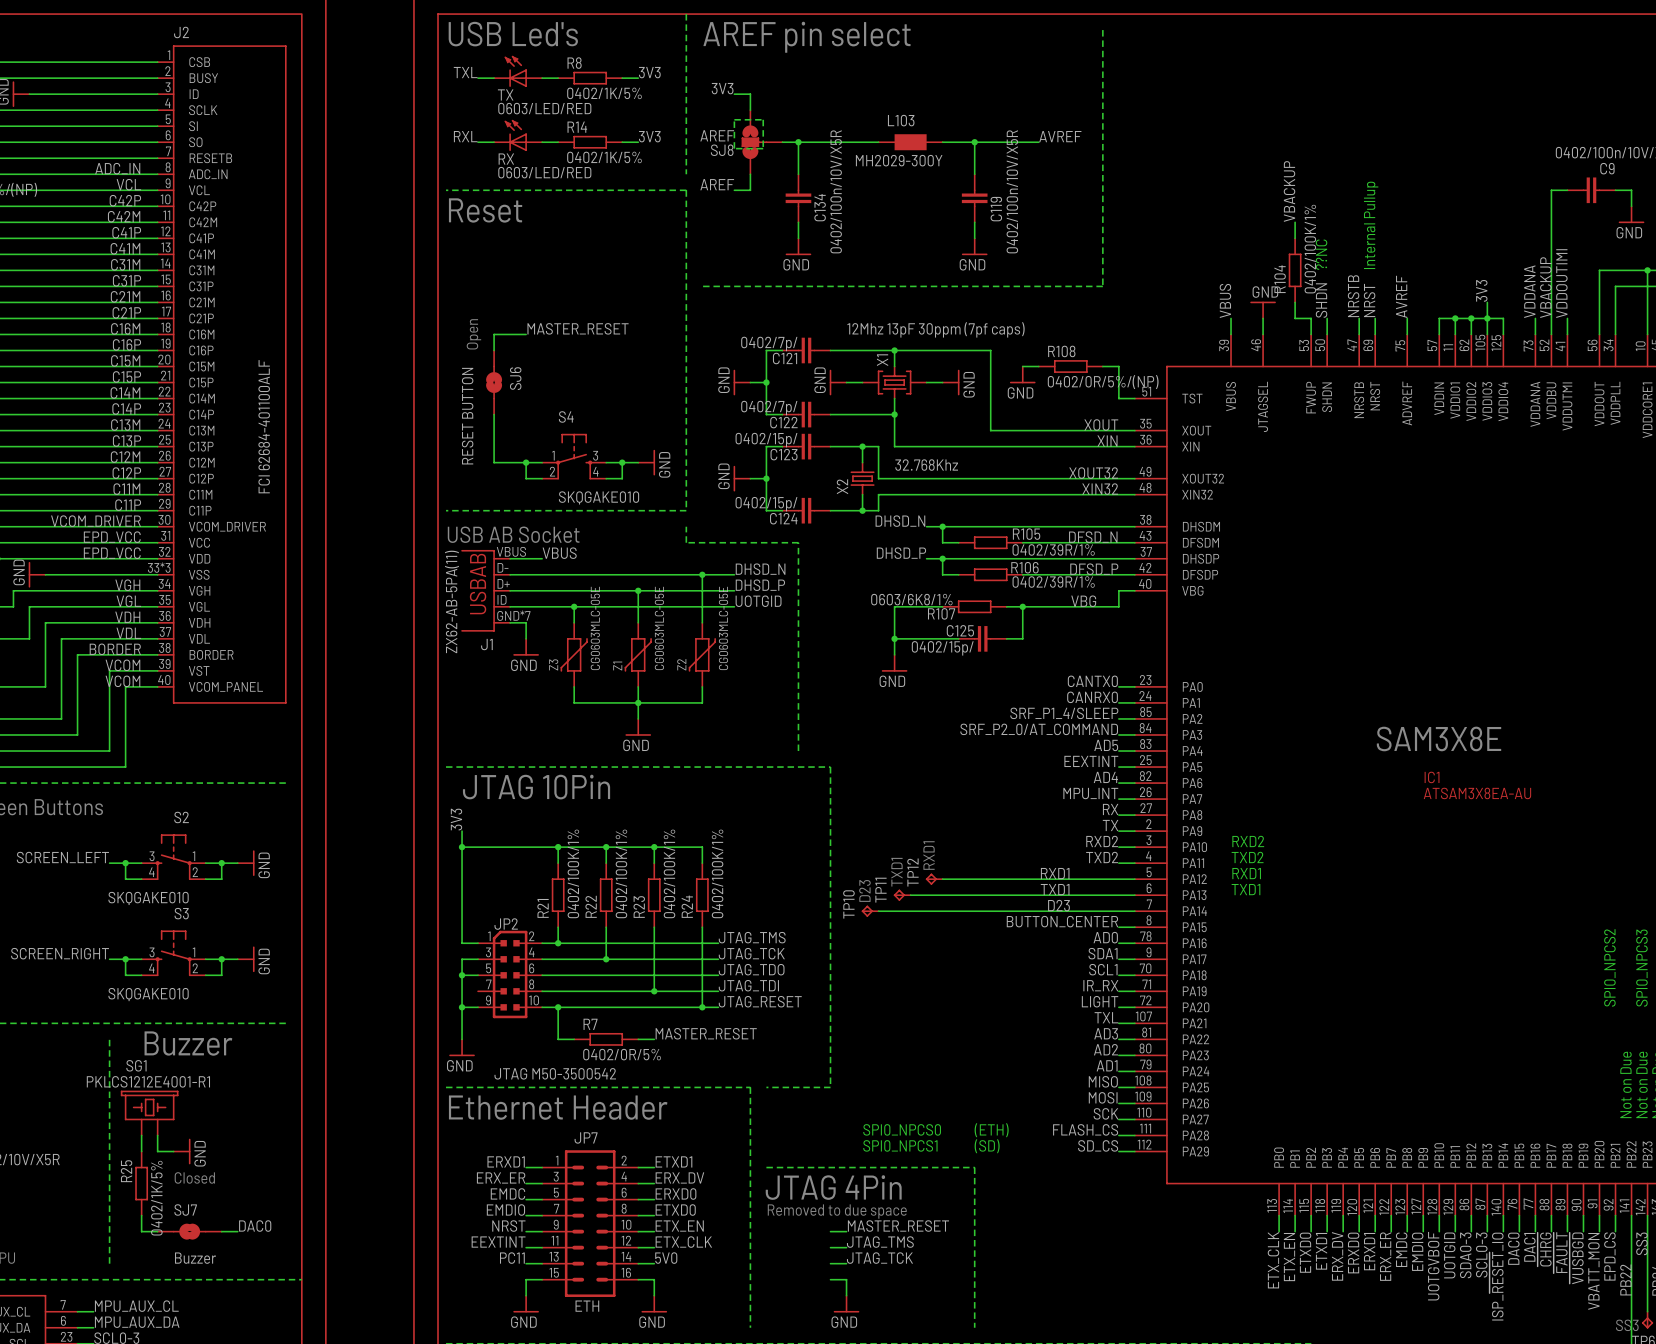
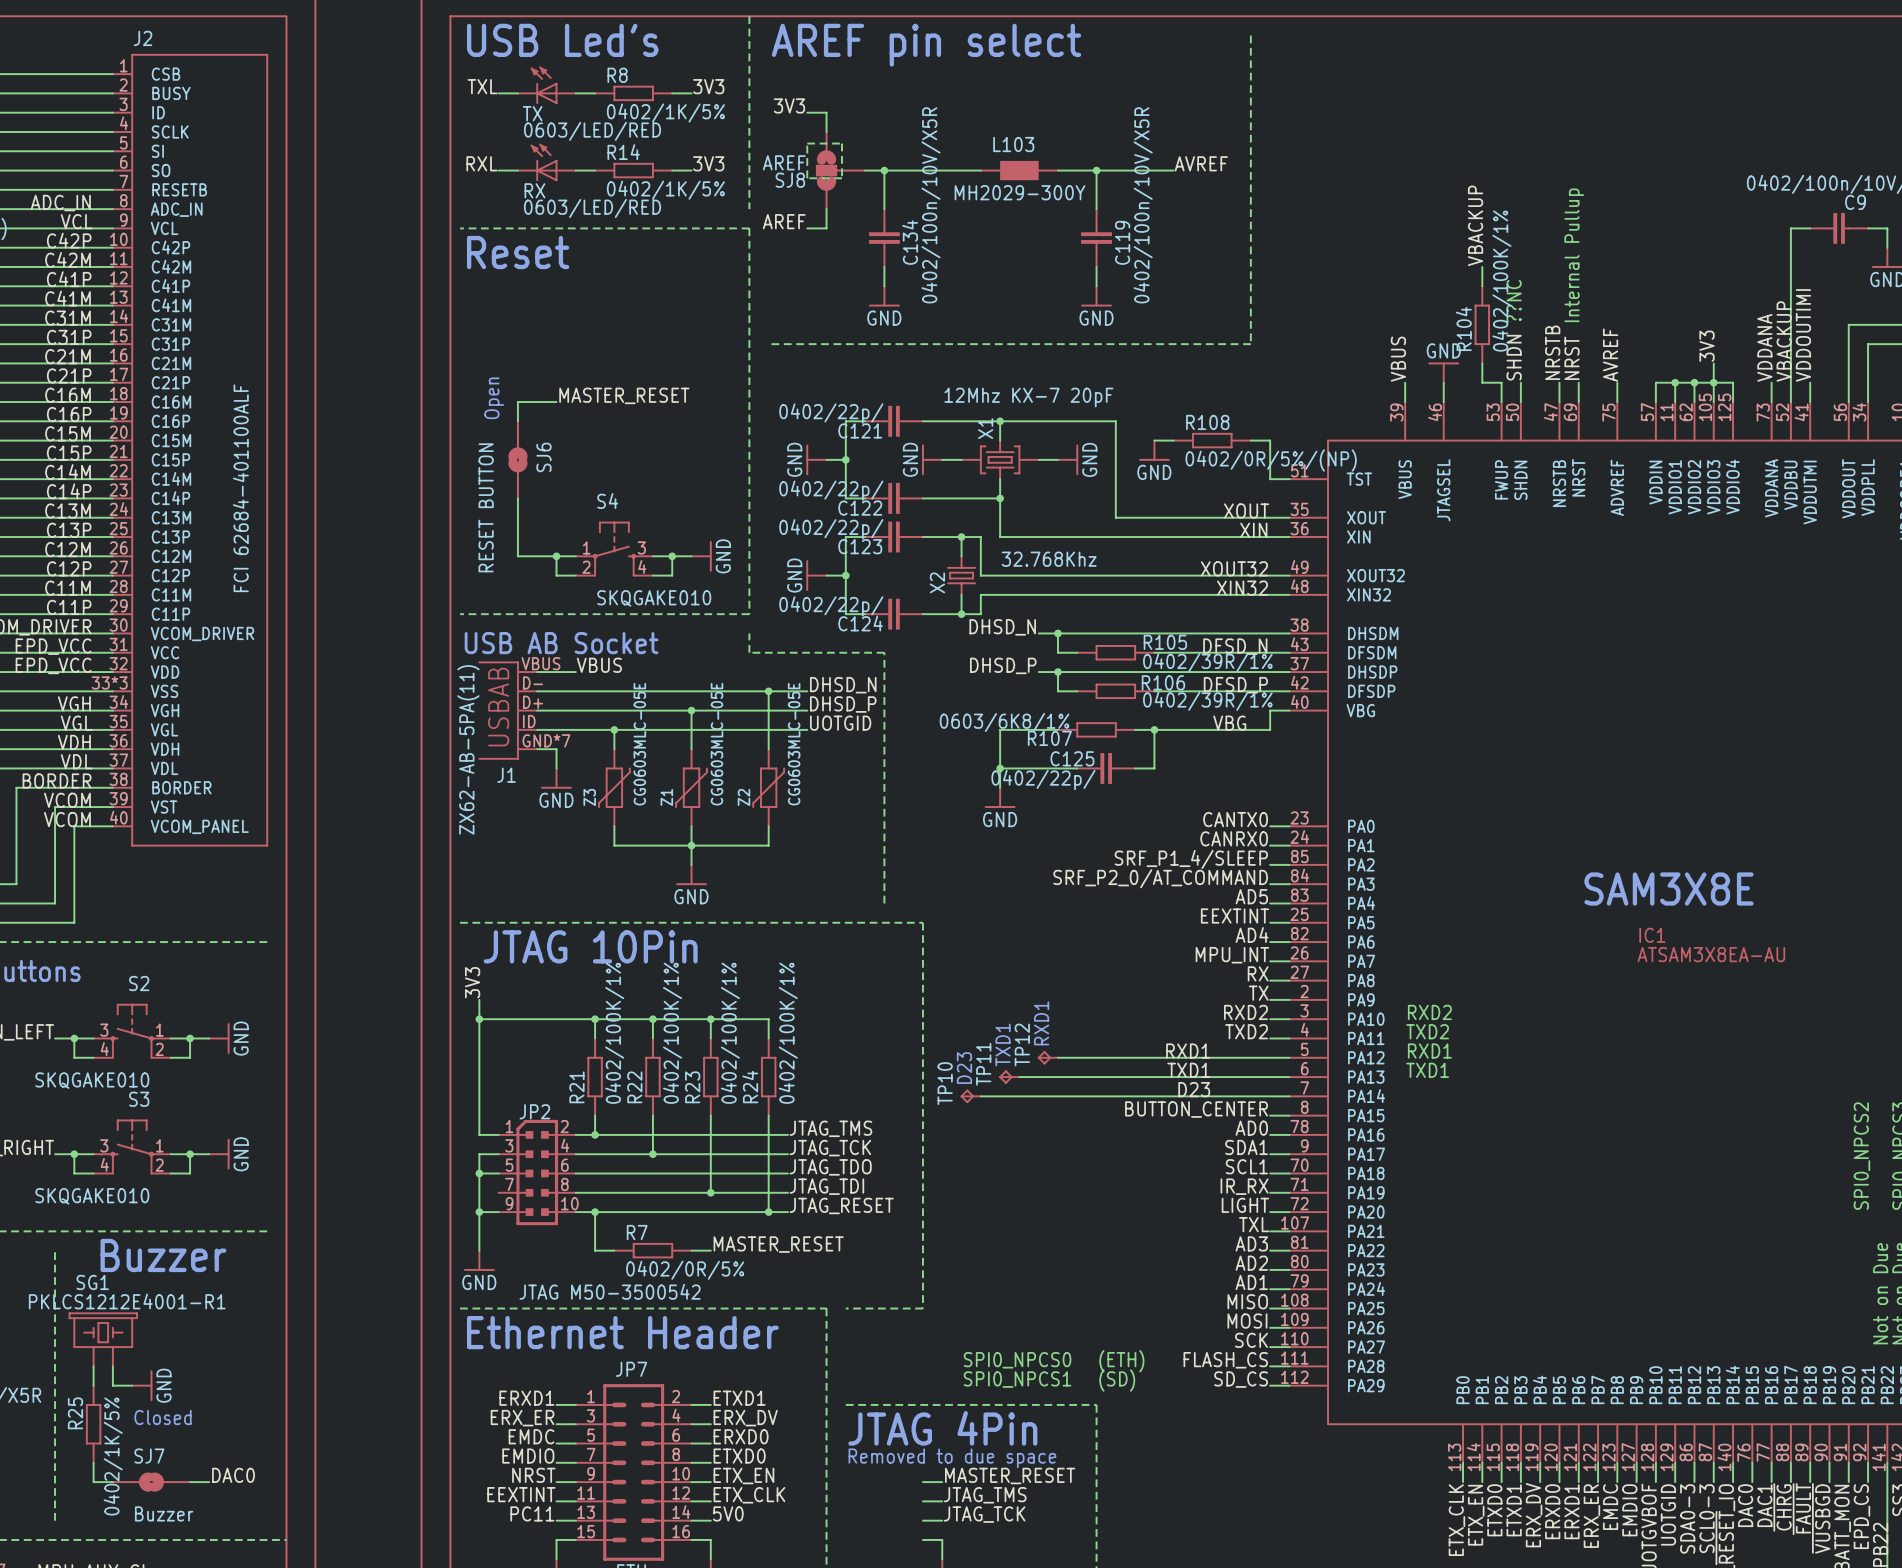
X1 value: 12Mhz 13pF 30ppm (7pf caps) (935, 329) -> 12Mhz KX-7 20pF (1028, 397)
C121 value: 0402/7p/ (769, 343) -> 0402/22p/ (831, 413)
C122 value: 0402/7p/ (769, 408) -> 0402/22p/ (831, 490)
C123 value: 0402/15p/ (766, 440) -> 0402/22p/ (831, 529)
C124 value: 0402/15p/ (766, 504) -> 0402/22p/ (831, 606)
C125 value: 0402/15p/ (942, 648) -> 0402/22p/ (1043, 780)

